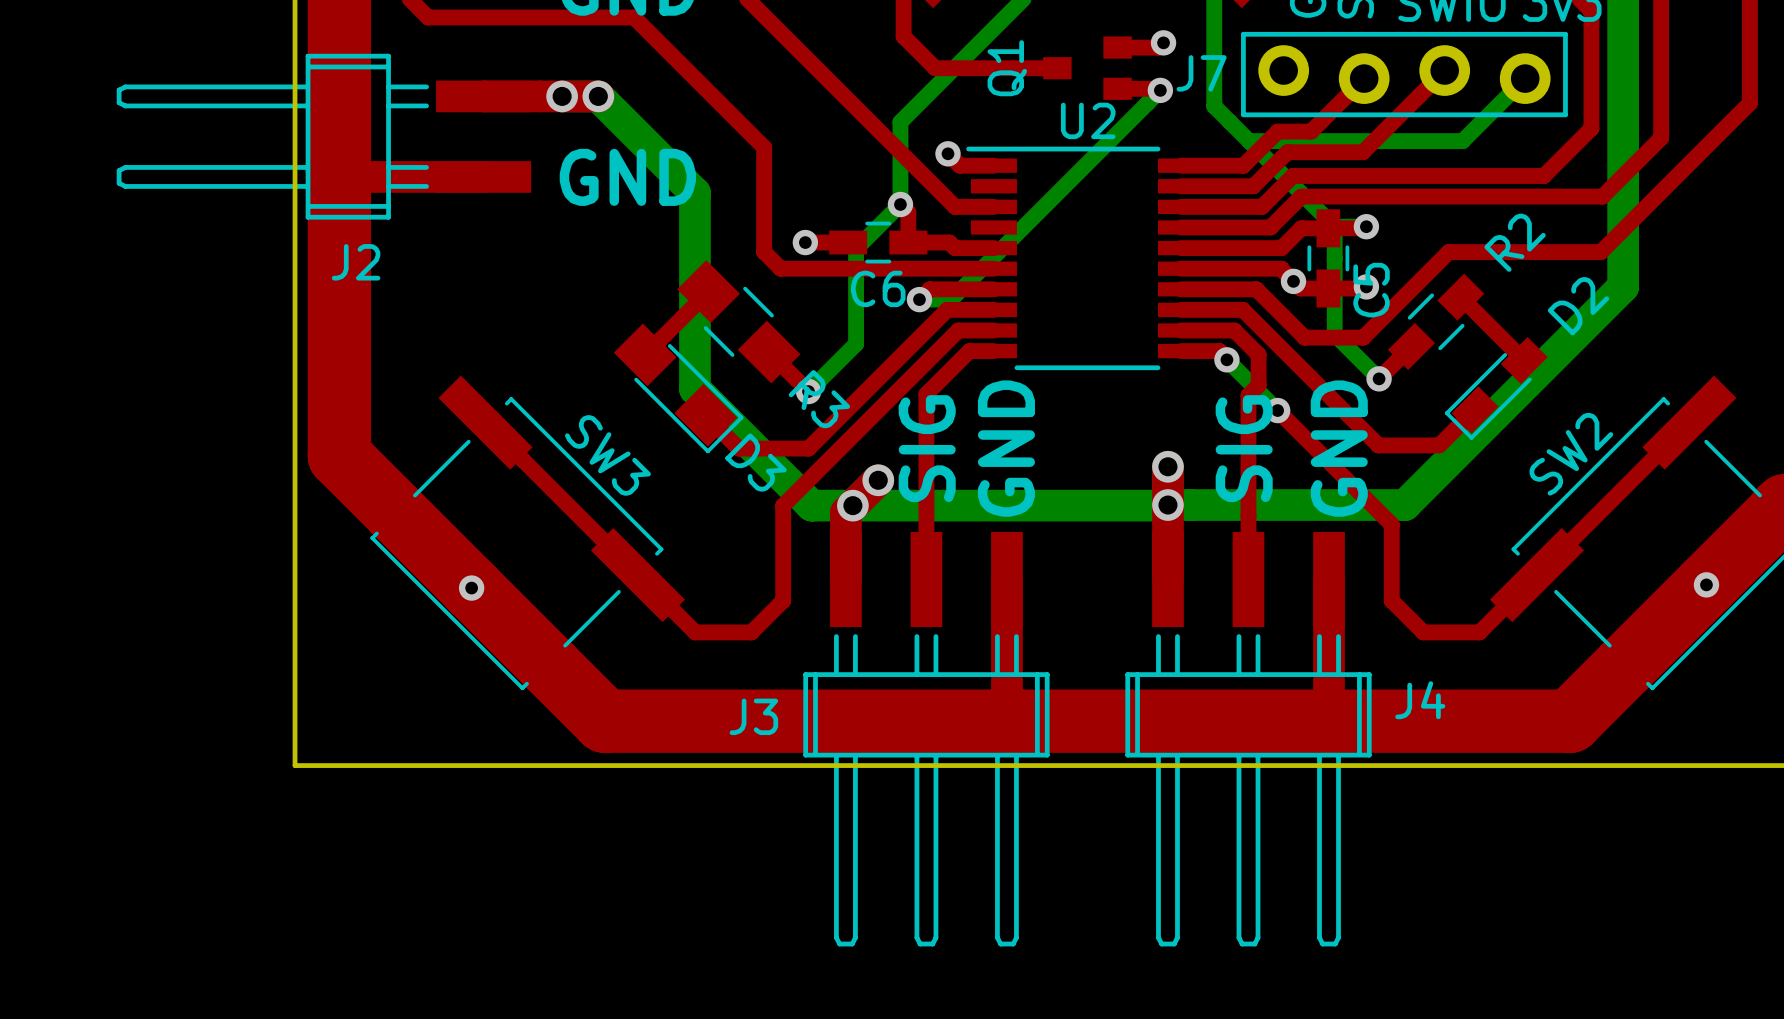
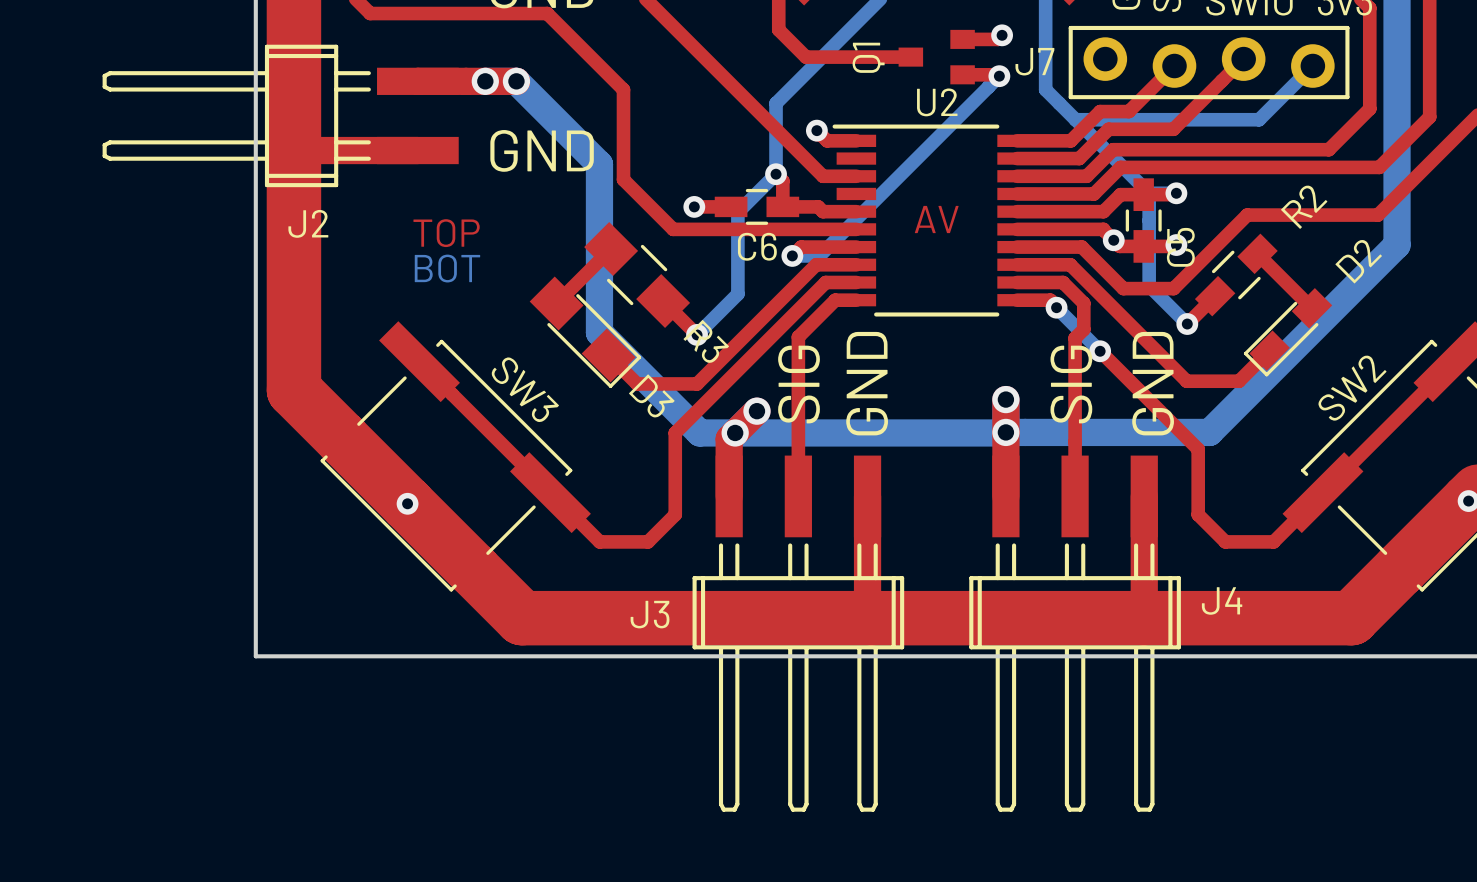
top track: (722, 106) (764, 147) (764, 252) -> (623, 89) (623, 179) (658, 215)
text: none -> AV (936, 219)
text: none -> TOP (446, 233)
text: none -> BOT (447, 268)

